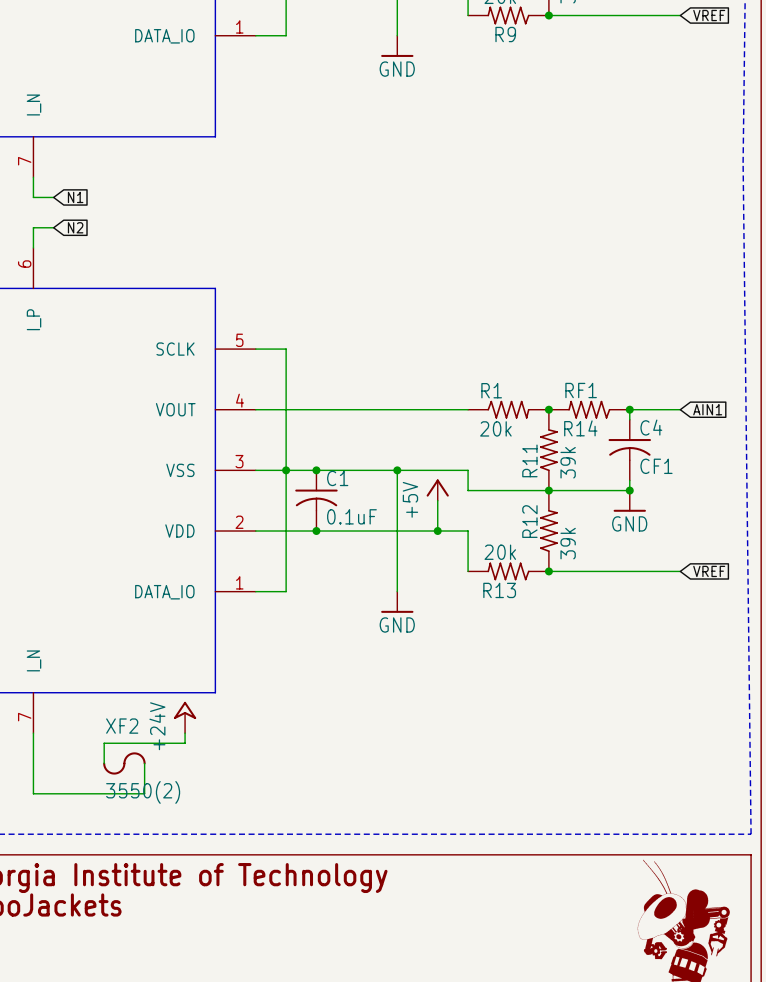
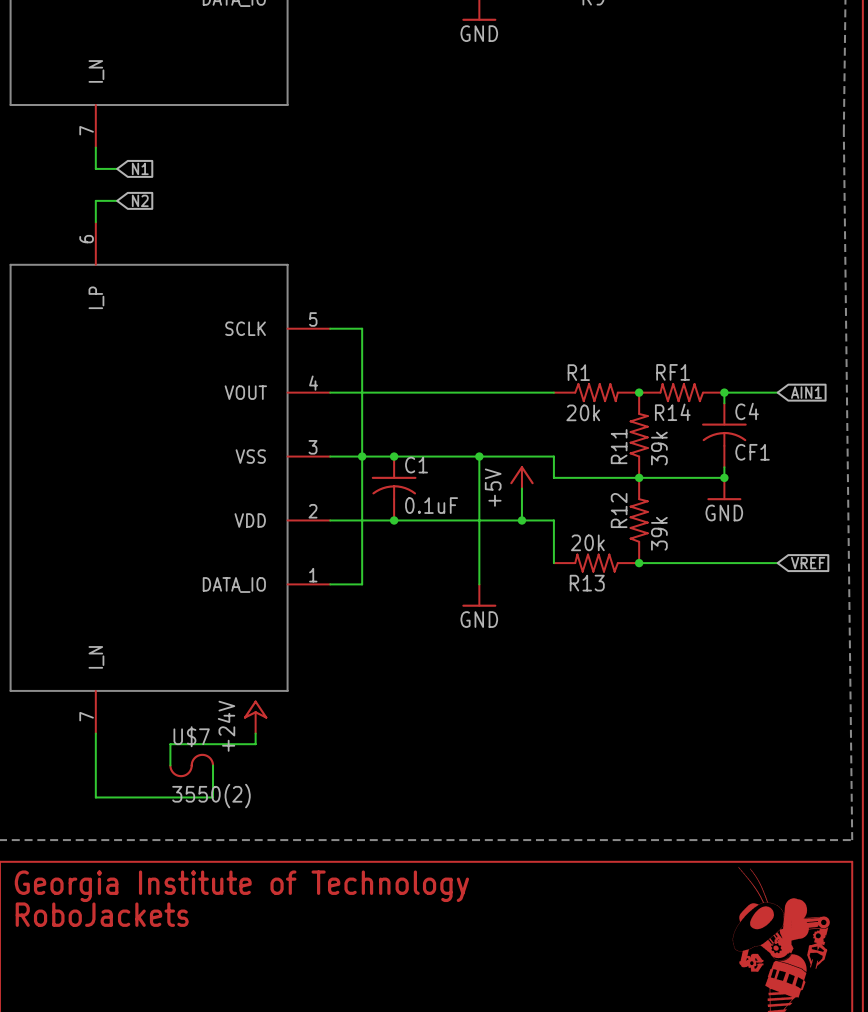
XF2 name: XF2 (122, 726) -> U$7 (191, 736)

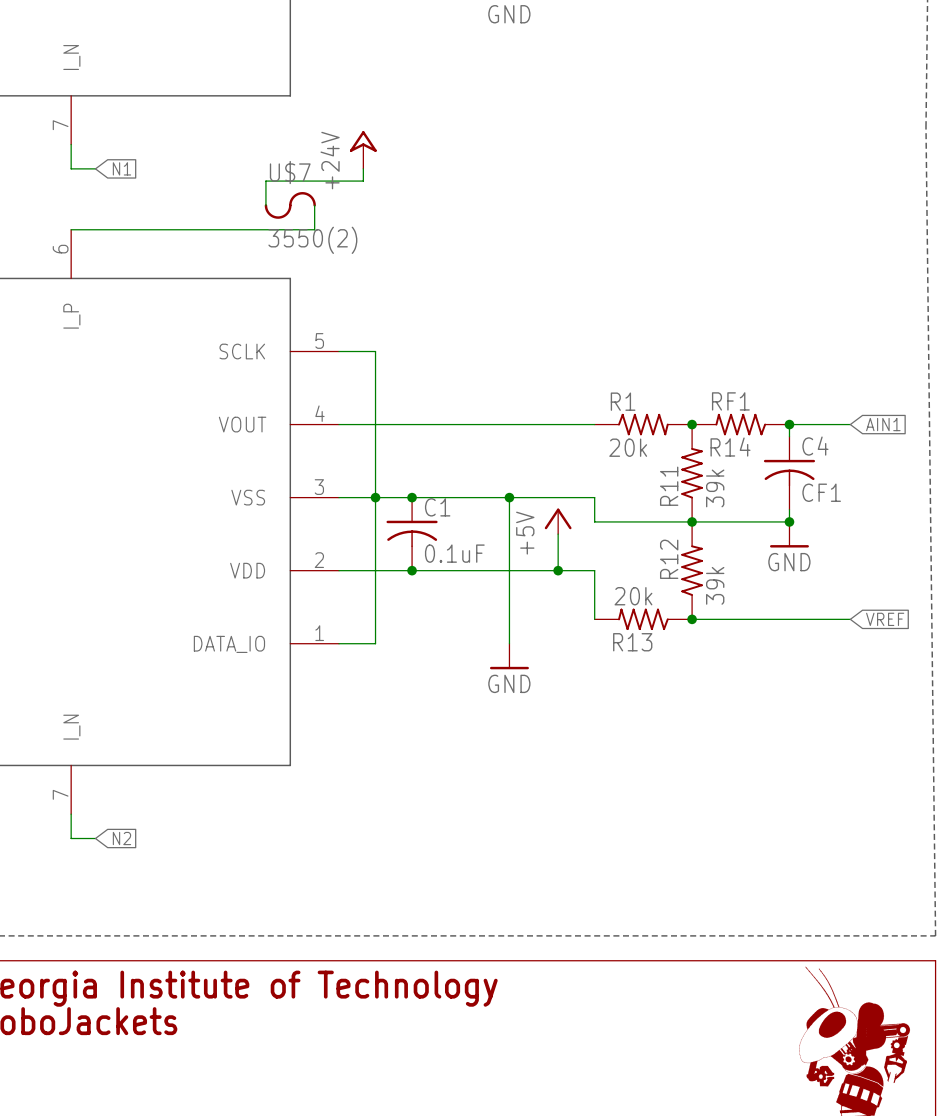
power symbol: none -> +24V (363, 150)
wire: none -> (363, 168) (363, 181) (265, 181) (265, 205)
wire: (117, 200) (95, 200) (95, 222) -> (314, 205) (314, 229) (71, 229)
global label: N2 (140, 200) -> none
power symbol: +24V (255, 717) -> none
wire: (255, 733) (255, 744) (170, 744) (170, 765) -> none
wire: (95, 754) (95, 797) (213, 797) (213, 765) -> (71, 838) (95, 838)
global label: none -> N2 (121, 838)
U$7 position: (191, 765) -> (290, 205)

